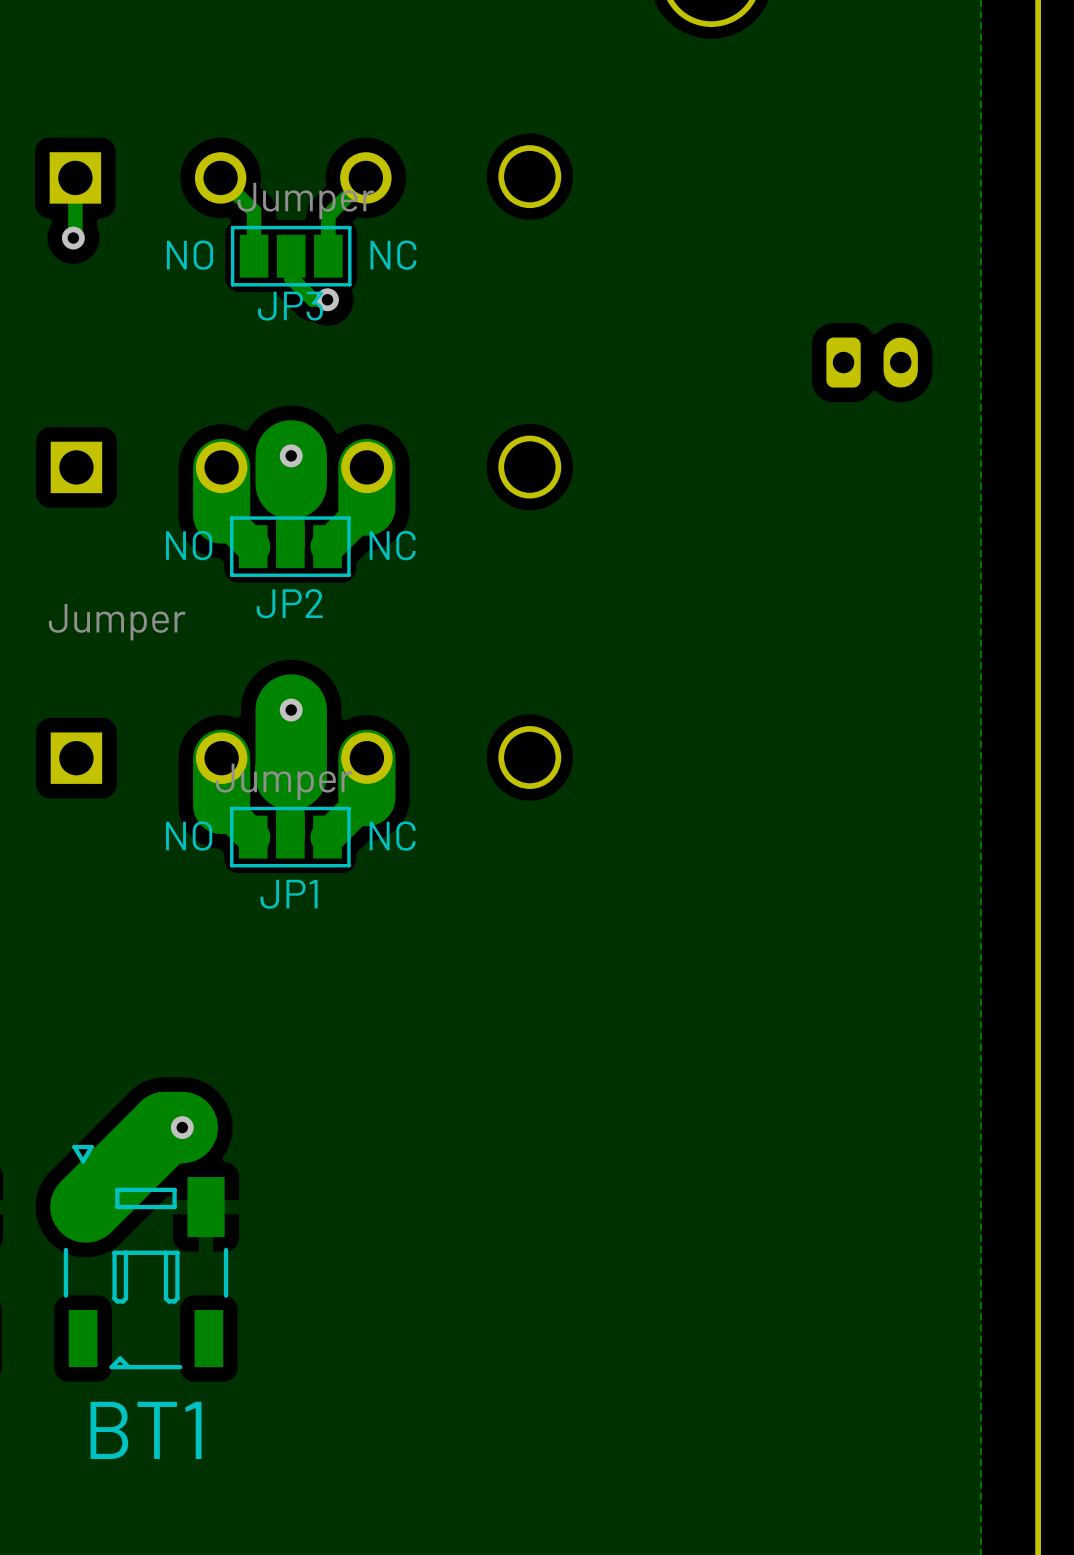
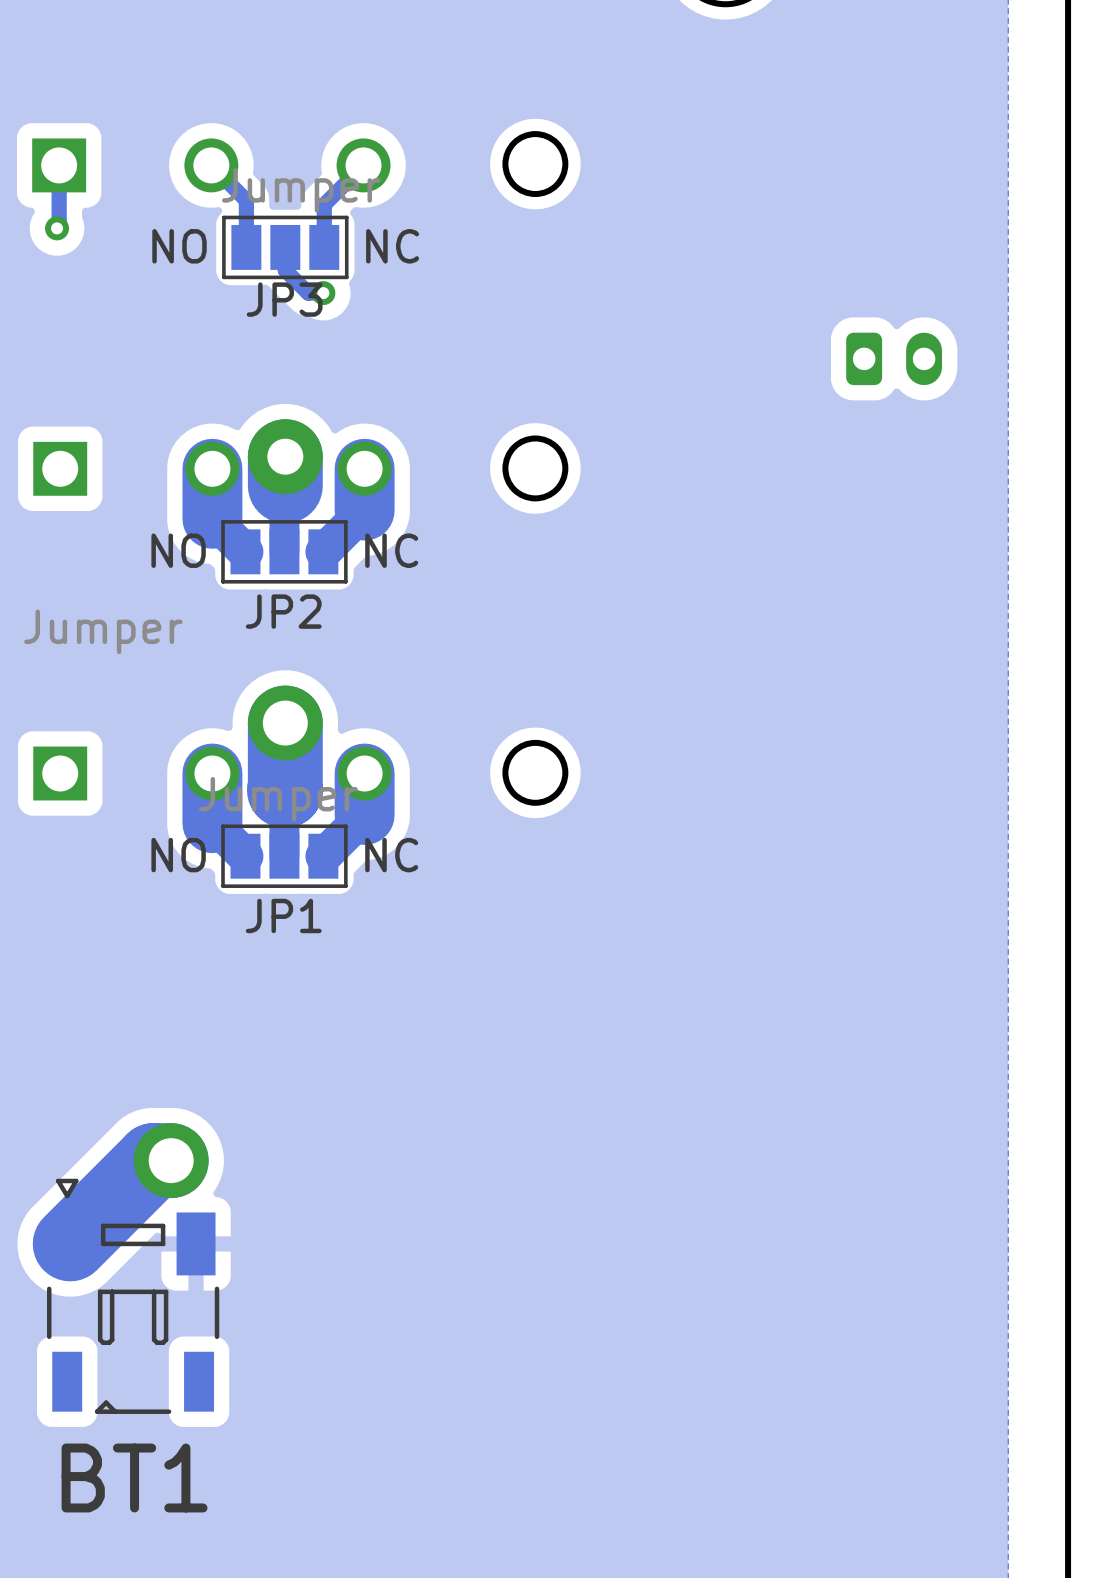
via size: [279, 444, 303, 468] -> [247, 419, 323, 495]
via size: [279, 698, 303, 722] -> [247, 685, 323, 761]
via size: [170, 1116, 194, 1139] -> [133, 1123, 209, 1199]

